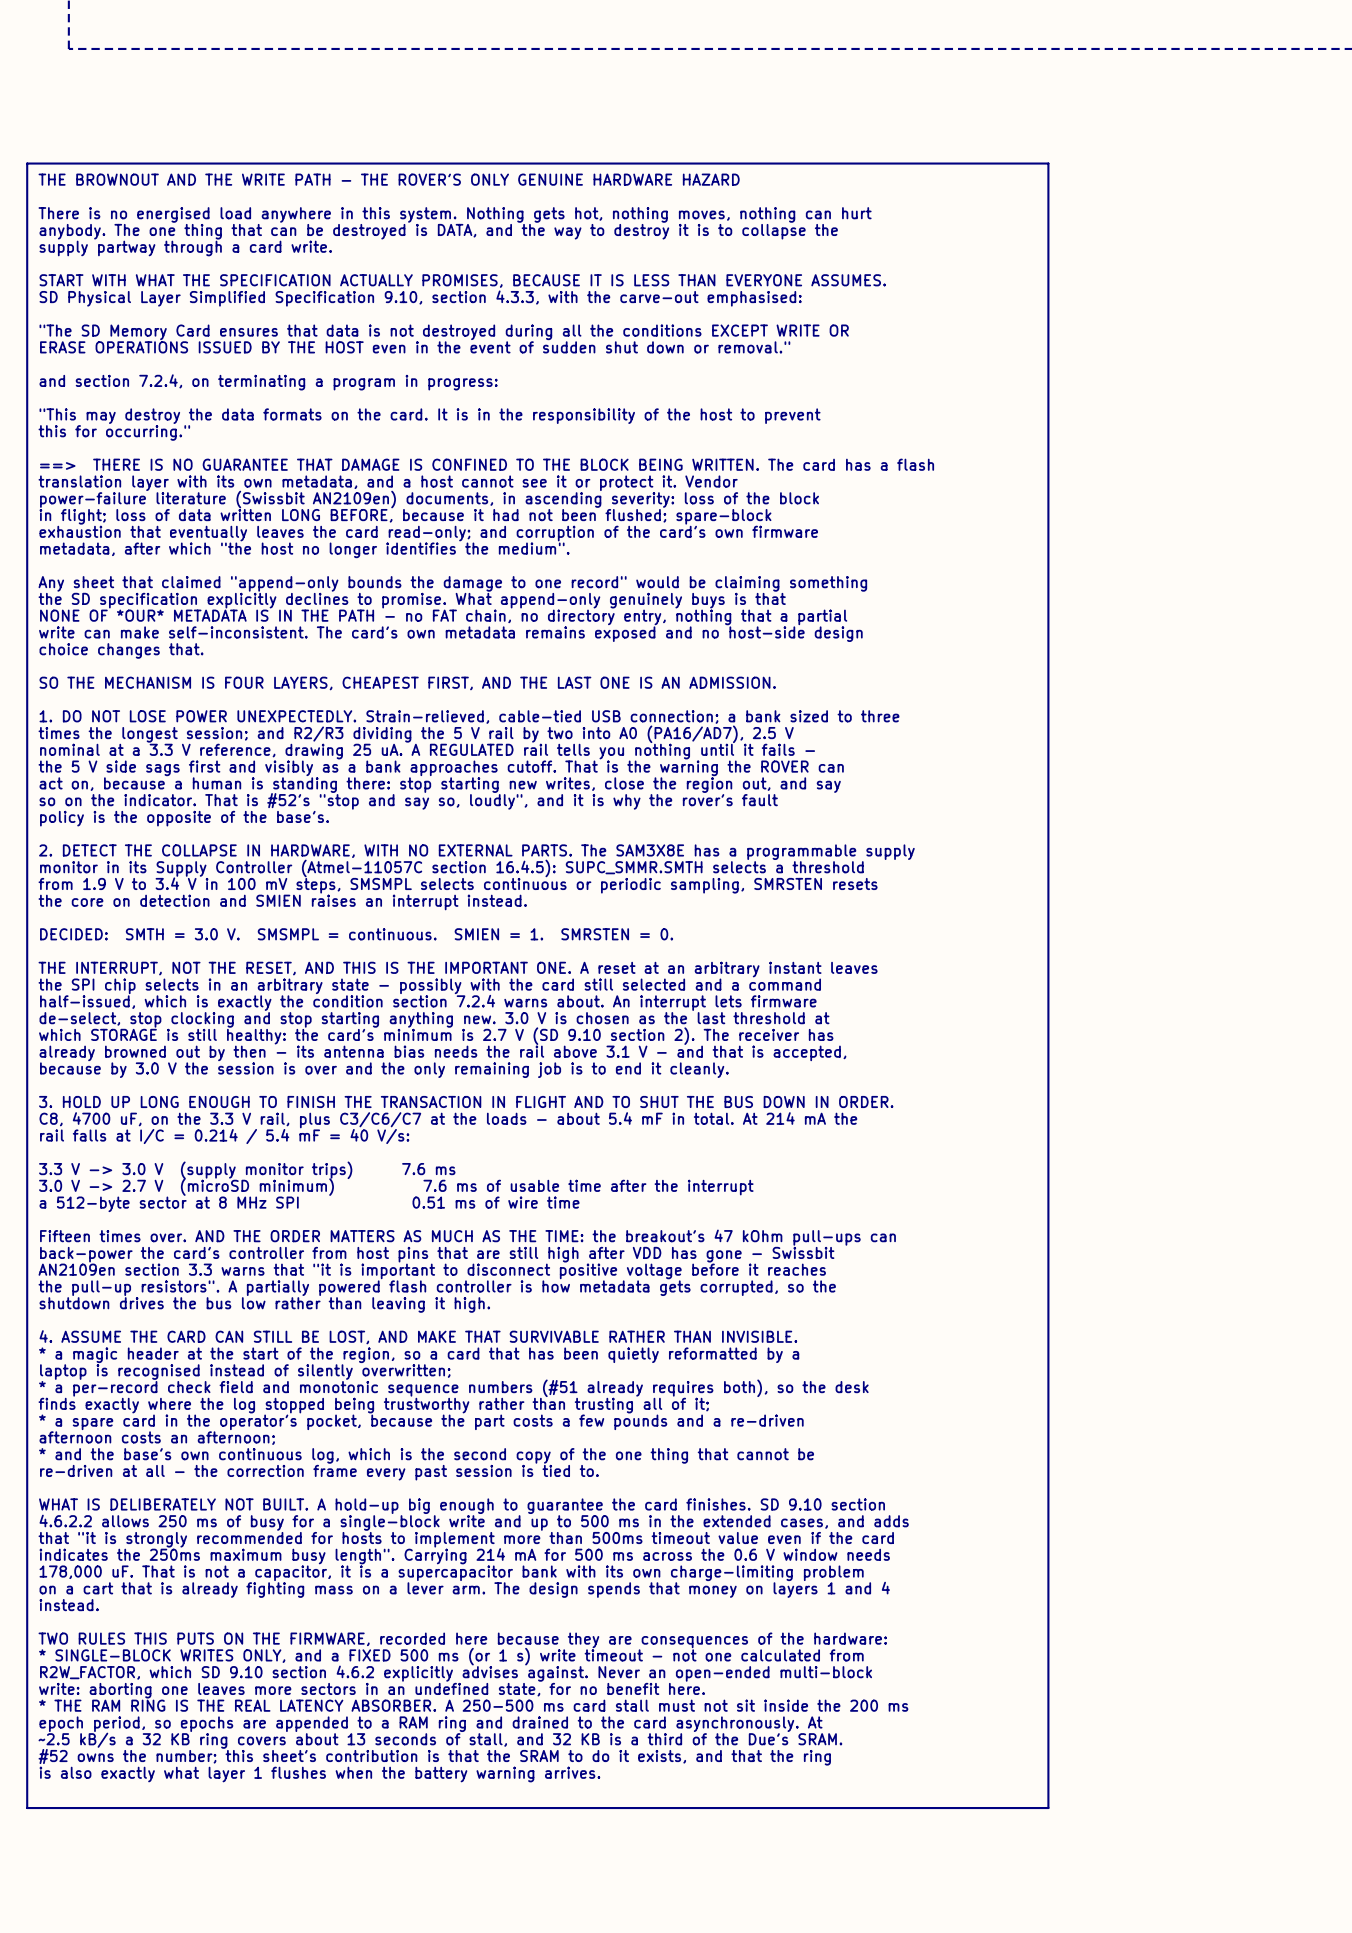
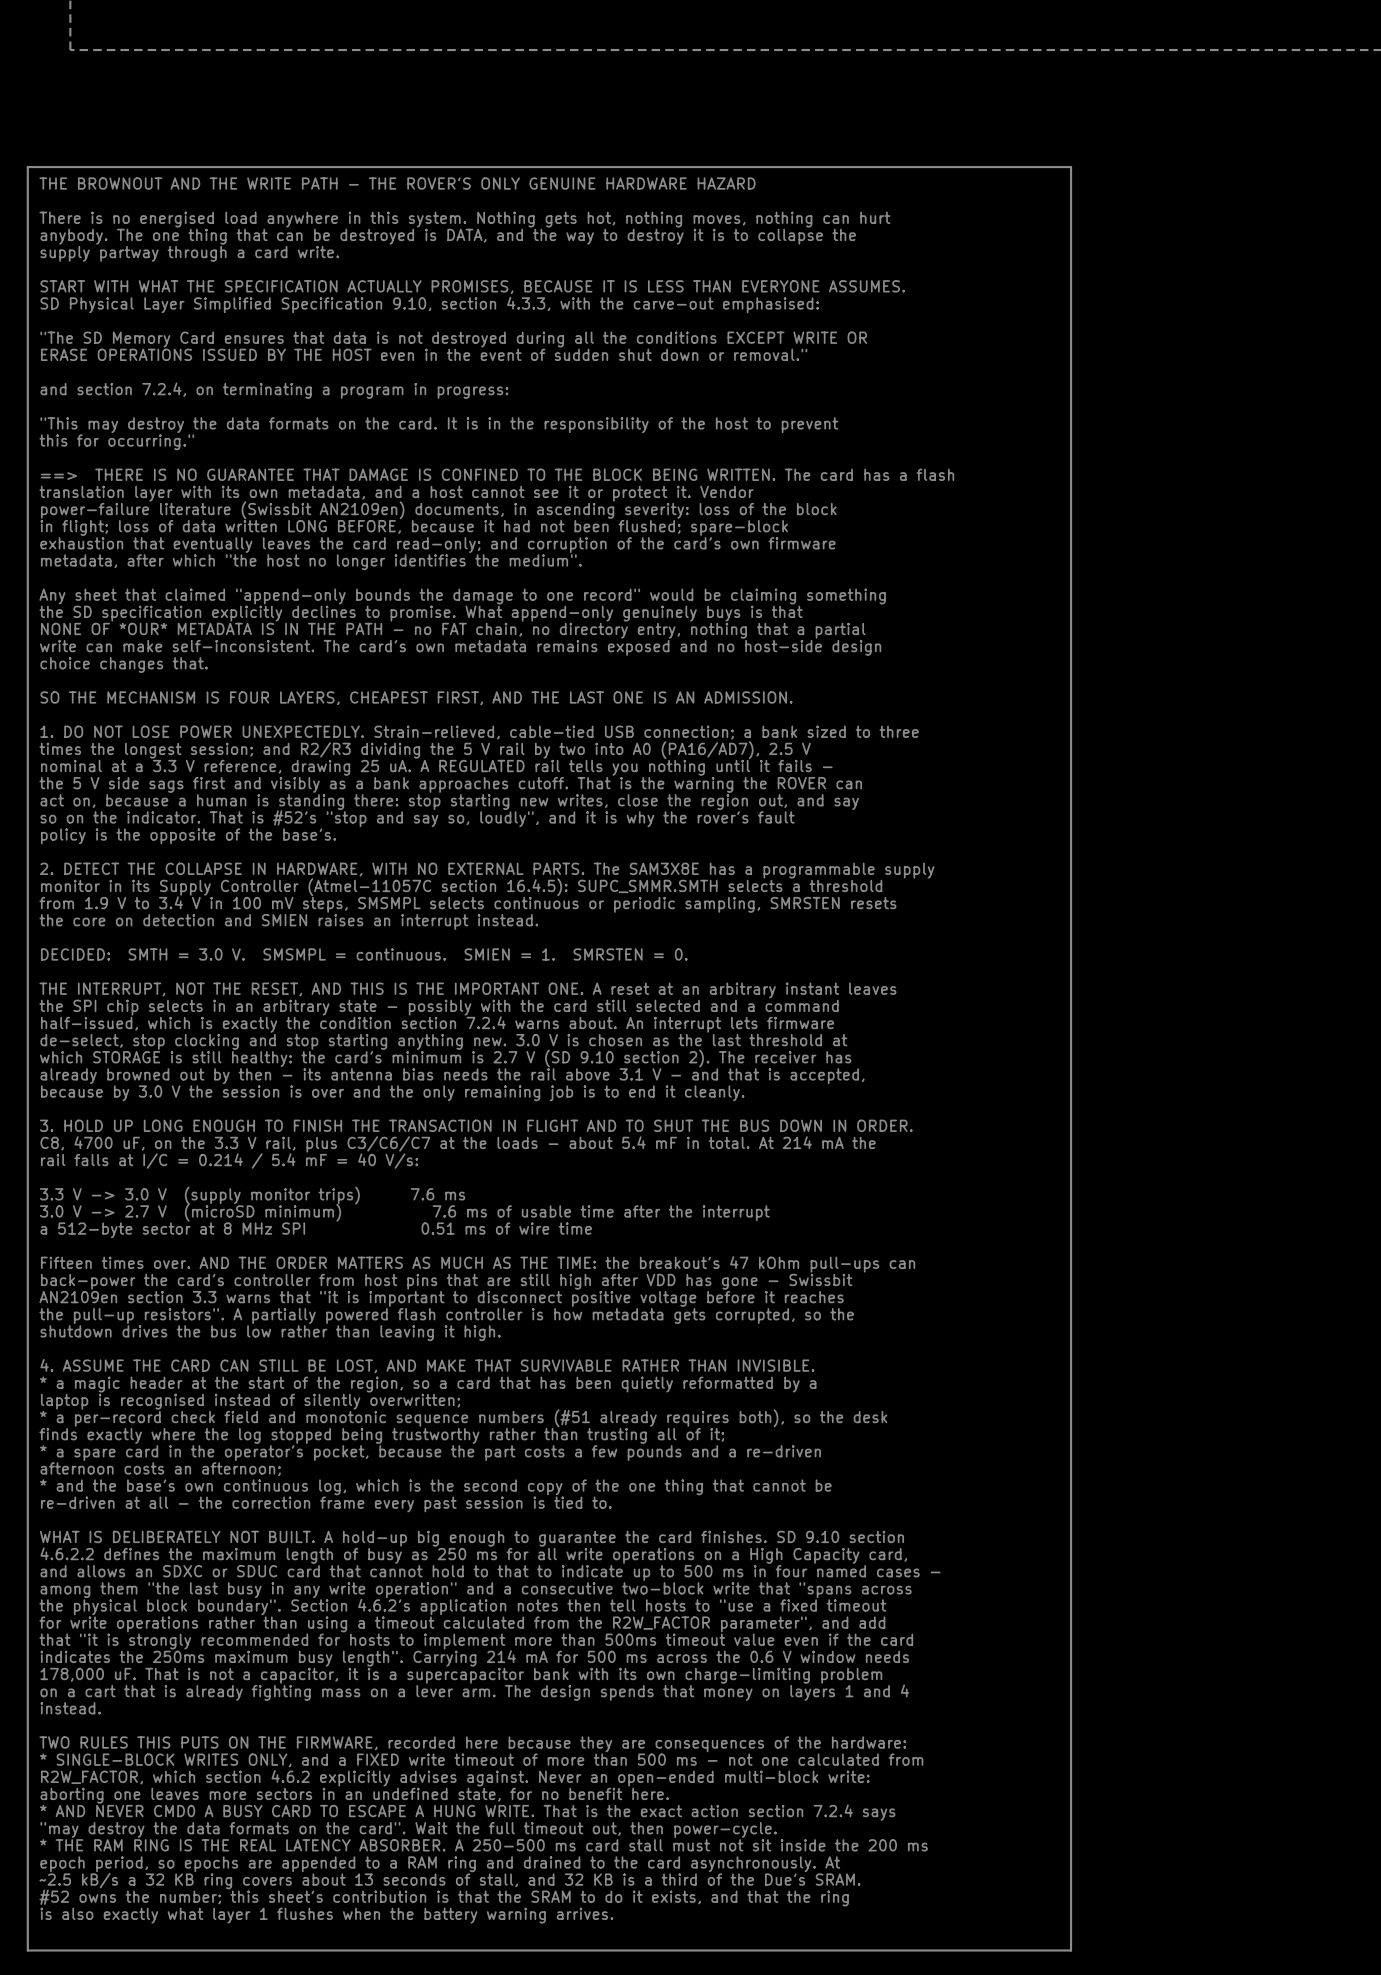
text: 4.6.2.2 allows 250 ms of busy for a single-block write and up to 500 ms in the extended cases, and adds (474, 1522) -> 4.6.2.2 defines the maximum length of busy as 250 ms for all write operations on a High Capacity card, (473, 1555)
text: that "it is strongly recommended for hosts to implement more than 500ms timeout value even if the card (466, 1539) -> and allows an SDXC or SDUC card that cannot hold to that to indicate up to 500 ms in four named cases - (490, 1572)
text: indicates the 250ms maximum busy length". Carrying 214 mA for 500 ms across the 0.6 V window needs (464, 1556) -> among them "the last busy in any write operation" and a consecutive two-block write that "spans across (476, 1590)
text: 178,000 uF. That is not a capacitor, it is a supercapacitor bank with its own charge-limiting problem (451, 1573) -> the physical block boundary". Section 4.6.2's application notes then tell hosts to "use a fixed timeout (462, 1606)
text: on a cart that is already fighting mass on a lever arm. The design spends that money on layers 1 and 4 (464, 1589) -> for write operations rather than using a timeout calculated from the R2W_FACTOR parameter", and add (462, 1624)
text: instead. (69, 1605) -> that "it is strongly recommended for hosts to implement more than 500ms timeout value even if the card (476, 1641)
text: none -> indicates the 250ms maximum busy length". Carrying 214 mA for 500 ms across the 0.6 V window needs (474, 1658)
text: TWO RULES THIS PUTS ON THE FIRMWARE, recorded here because they are consequences of the hardware: (462, 1640) -> 178,000 uF. That is not a capacitor, it is a supercapacitor bank with its own charge-limiting problem (461, 1675)
text: * SINGLE-BLOCK WRITES ONLY, and a FIXED 500 ms (or 1 s) write timeout - not one calculated from (451, 1656) -> on a cart that is already fighting mass on a lever arm. The design spends that money on layers 1 and 4 (474, 1692)
text: R2W_FACTOR, which SD 9.10 section 4.6.2 explicitly advises against. Never an open-ended multi-block (456, 1673) -> instead. (70, 1708)
text: write: aborting one leaves more sectors in an undefined state, for no benefit here. (371, 1690) -> none
text: * THE RAM RING IS THE REAL LATENCY ABSORBER. A 250-500 ms card stall must not sit inside the 200 ms (473, 1705) -> TWO RULES THIS PUTS ON THE FIRMWARE, recorded here because they are consequences of the hardware: (472, 1744)
text: epoch period, so epochs are appended to a RAM ring and drained to the card asynchronously. At (431, 1724) -> * SINGLE-BLOCK WRITES ONLY, and a FIXED write timeout of more than 500 ms - not one calculated from (481, 1760)
text: ~2.5 kB/s a 32 KB ring covers about 13 seconds of stall, and 32 KB is a third of the Due's SRAM. (440, 1740) -> R2W_FACTOR, which section 4.6.2 explicitly advises against. Never an open-ended multi-block write: (455, 1778)
text: #52 owns the number; this sheet's contribution is that the SRAM to do it exists, and that the ring (434, 1757) -> aborting one leaves more sectors in an undefined state, for no benefit here. (354, 1795)
text: is also exactly what layer 1 flushes when the battery warning arrives. (319, 1774) -> * AND NEVER CMD0 A BUSY CARD TO ESCAPE A HUNG WRITE. That is the exact action section 7.2.4 says (467, 1812)
text: none -> "may destroy the data formats on the card". Wait the full timeout out, then power-cycle. (408, 1829)
text: none -> * THE RAM RING IS THE REAL LATENCY ABSORBER. A 250-500 ms card stall must not sit inside the 200 ms (483, 1845)
line: (27, 1808) (1048, 1808) -> (27, 1847) (27, 1950) (1071, 1950) (1071, 1847)
text: none -> epoch period, so epochs are appended to a RAM ring and drained to the card asynchronously. At (440, 1864)
text: none -> ~2.5 kB/s a 32 KB ring covers about 13 seconds of stall, and 32 KB is a third of the Due's SRAM. (449, 1881)
text: none -> #52 owns the number; this sheet's contribution is that the SRAM to do it exists, and that the ring (444, 1897)
text: none -> is also exactly what layer 1 flushes when the battery warning arrives. (326, 1915)

